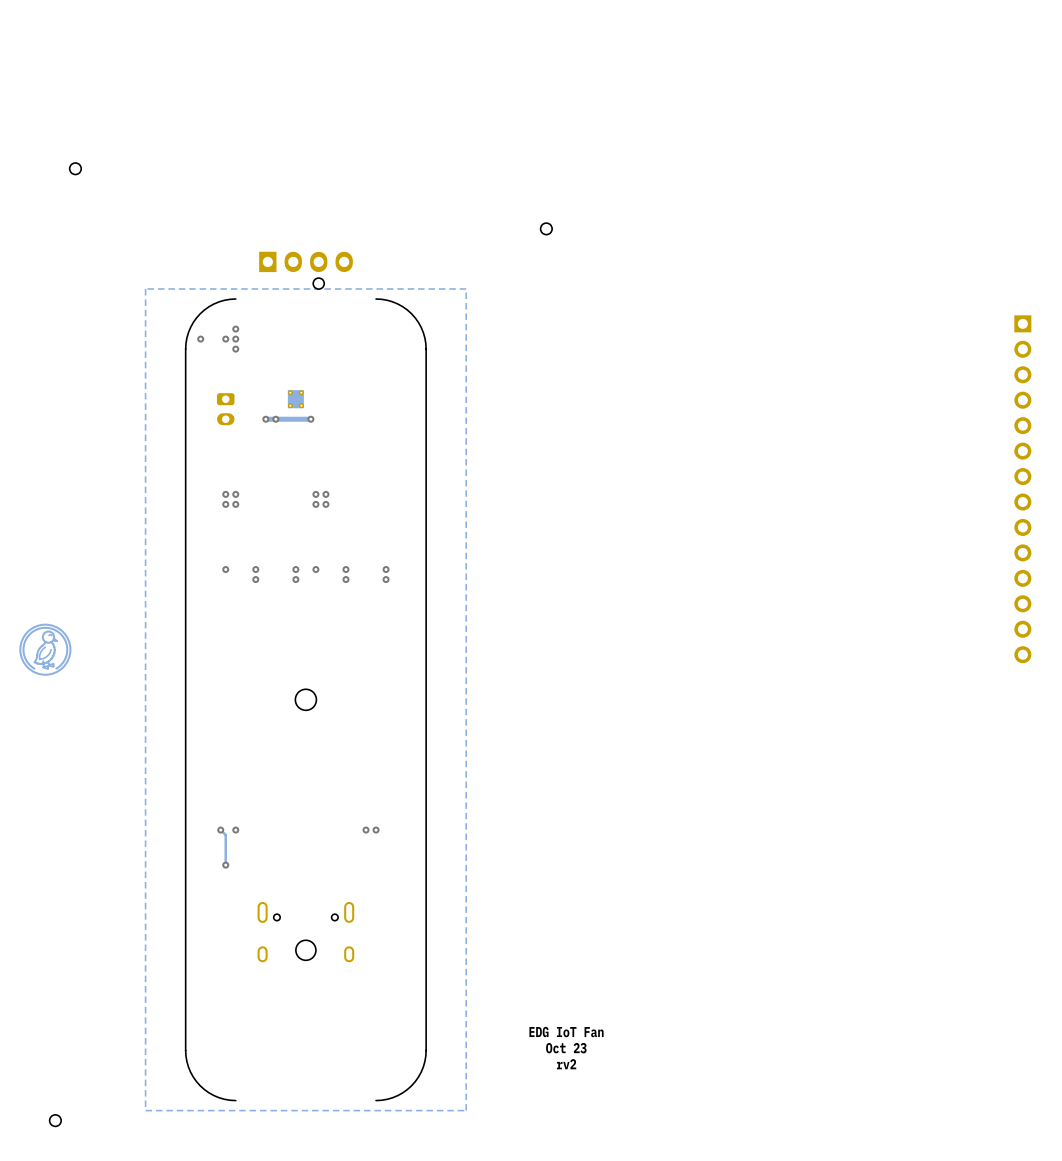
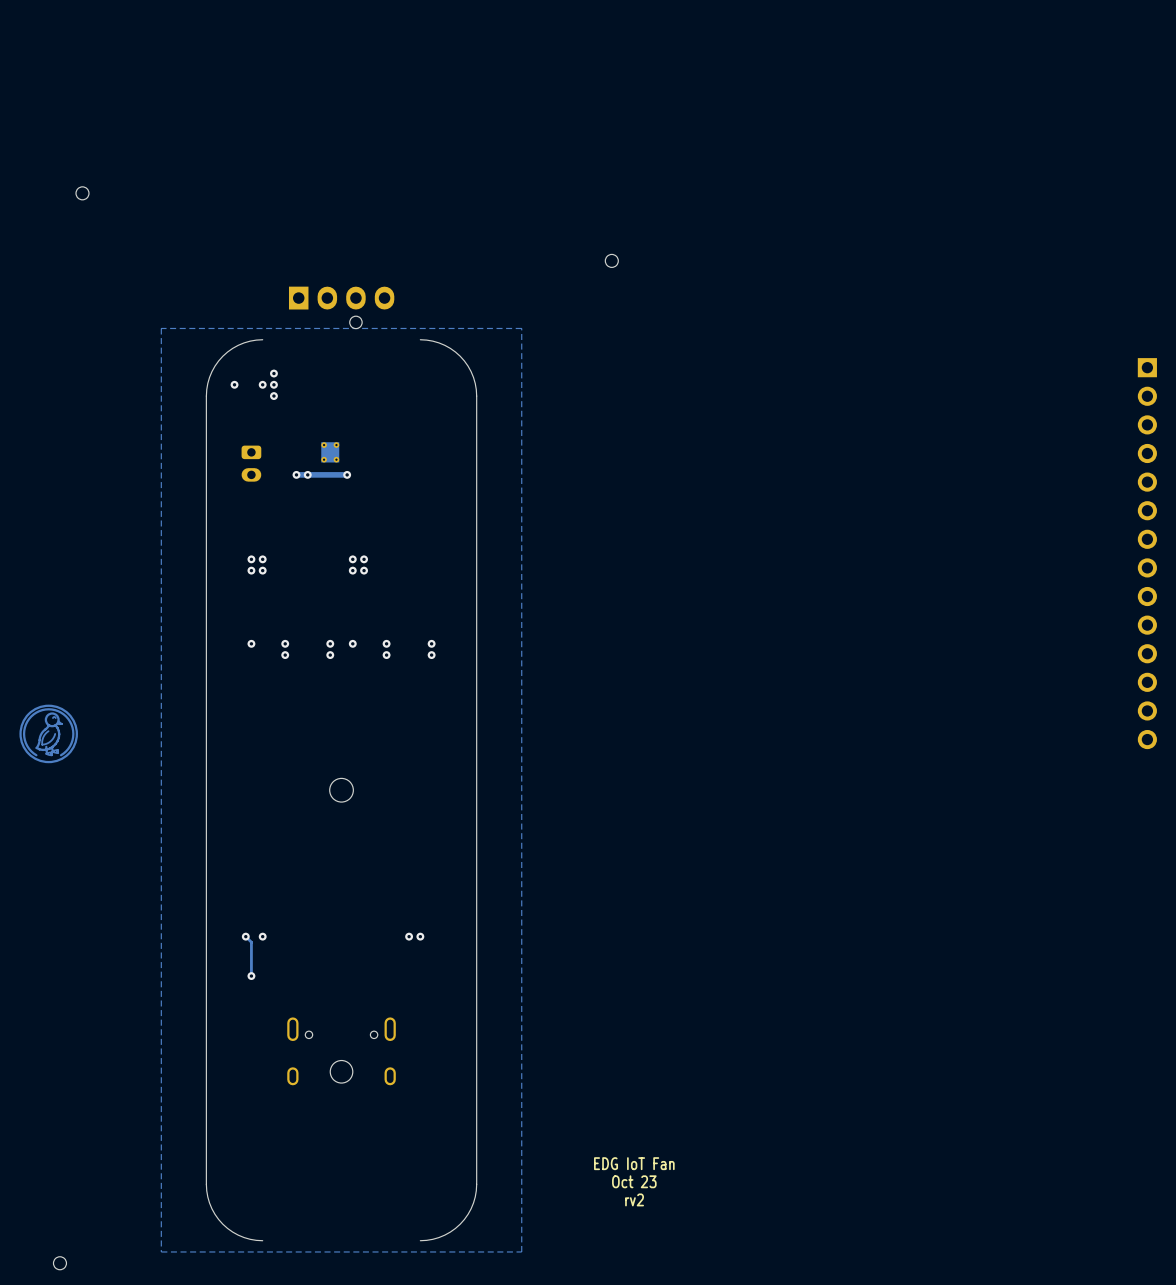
via: (235, 329) -> none
via: none -> (273, 373)
via: (200, 339) -> none
via: none -> (234, 384)
via: (225, 339) -> none
via: none -> (273, 384)
via: (235, 349) -> none
via: none -> (273, 396)

